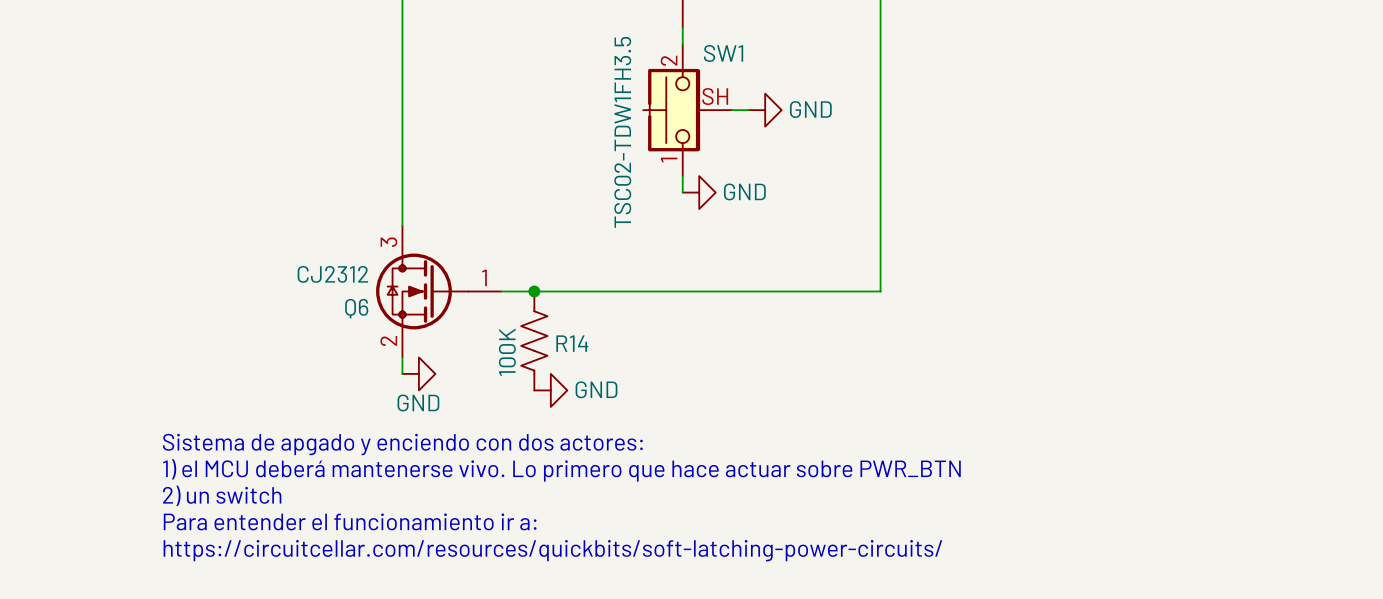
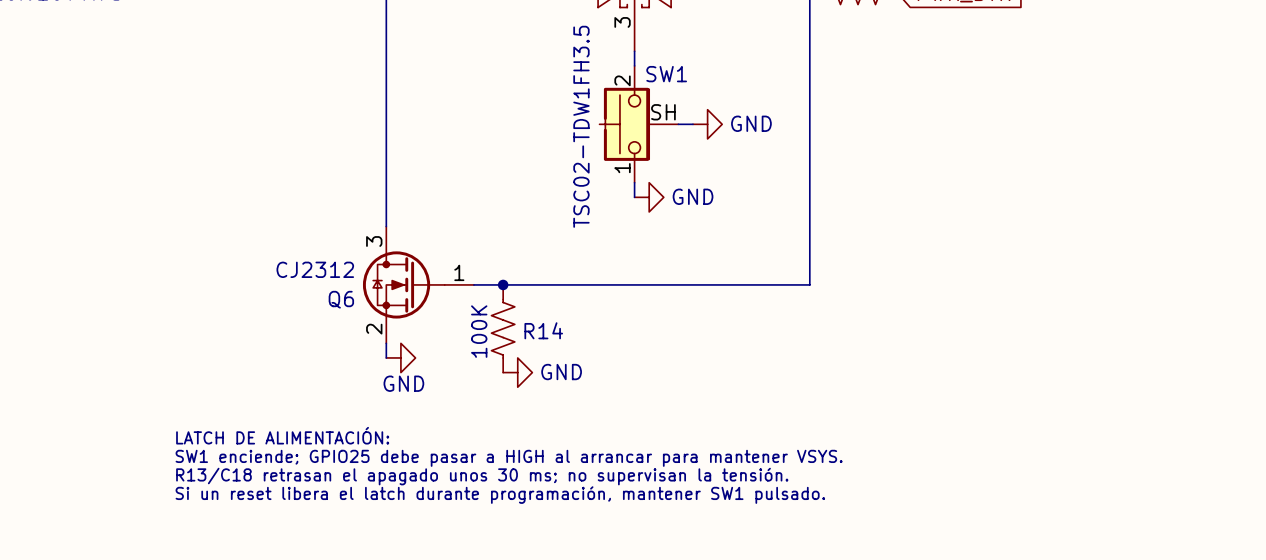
text: Sistema de apgado y enciendo con dos actores: (402, 444) -> none
text: 1) el MCU deberá mantenerse vivo. Lo primero que hace actuar sobre PWR_BTN (561, 470) -> LATCH DE ALIMENTACIÓN: (282, 435)
text: none -> SW1 enciende; GPIO25 debe pasar a HIGH al arrancar para mantener VSYS. (509, 458)
text: 2) un switch (222, 495) -> none
text: none -> R13/C18 retrasan el apagado unos 30 ms; no supervisan la tensión. (482, 476)
text: Para entender el funcionamiento ir a: (350, 521) -> Si un reset libera el latch durante programación, mantener SW1 pulsado. (500, 495)
text: https://circuitcellar.com/resources/quickbits/soft-latching-power-circuits/ (552, 550) -> none

